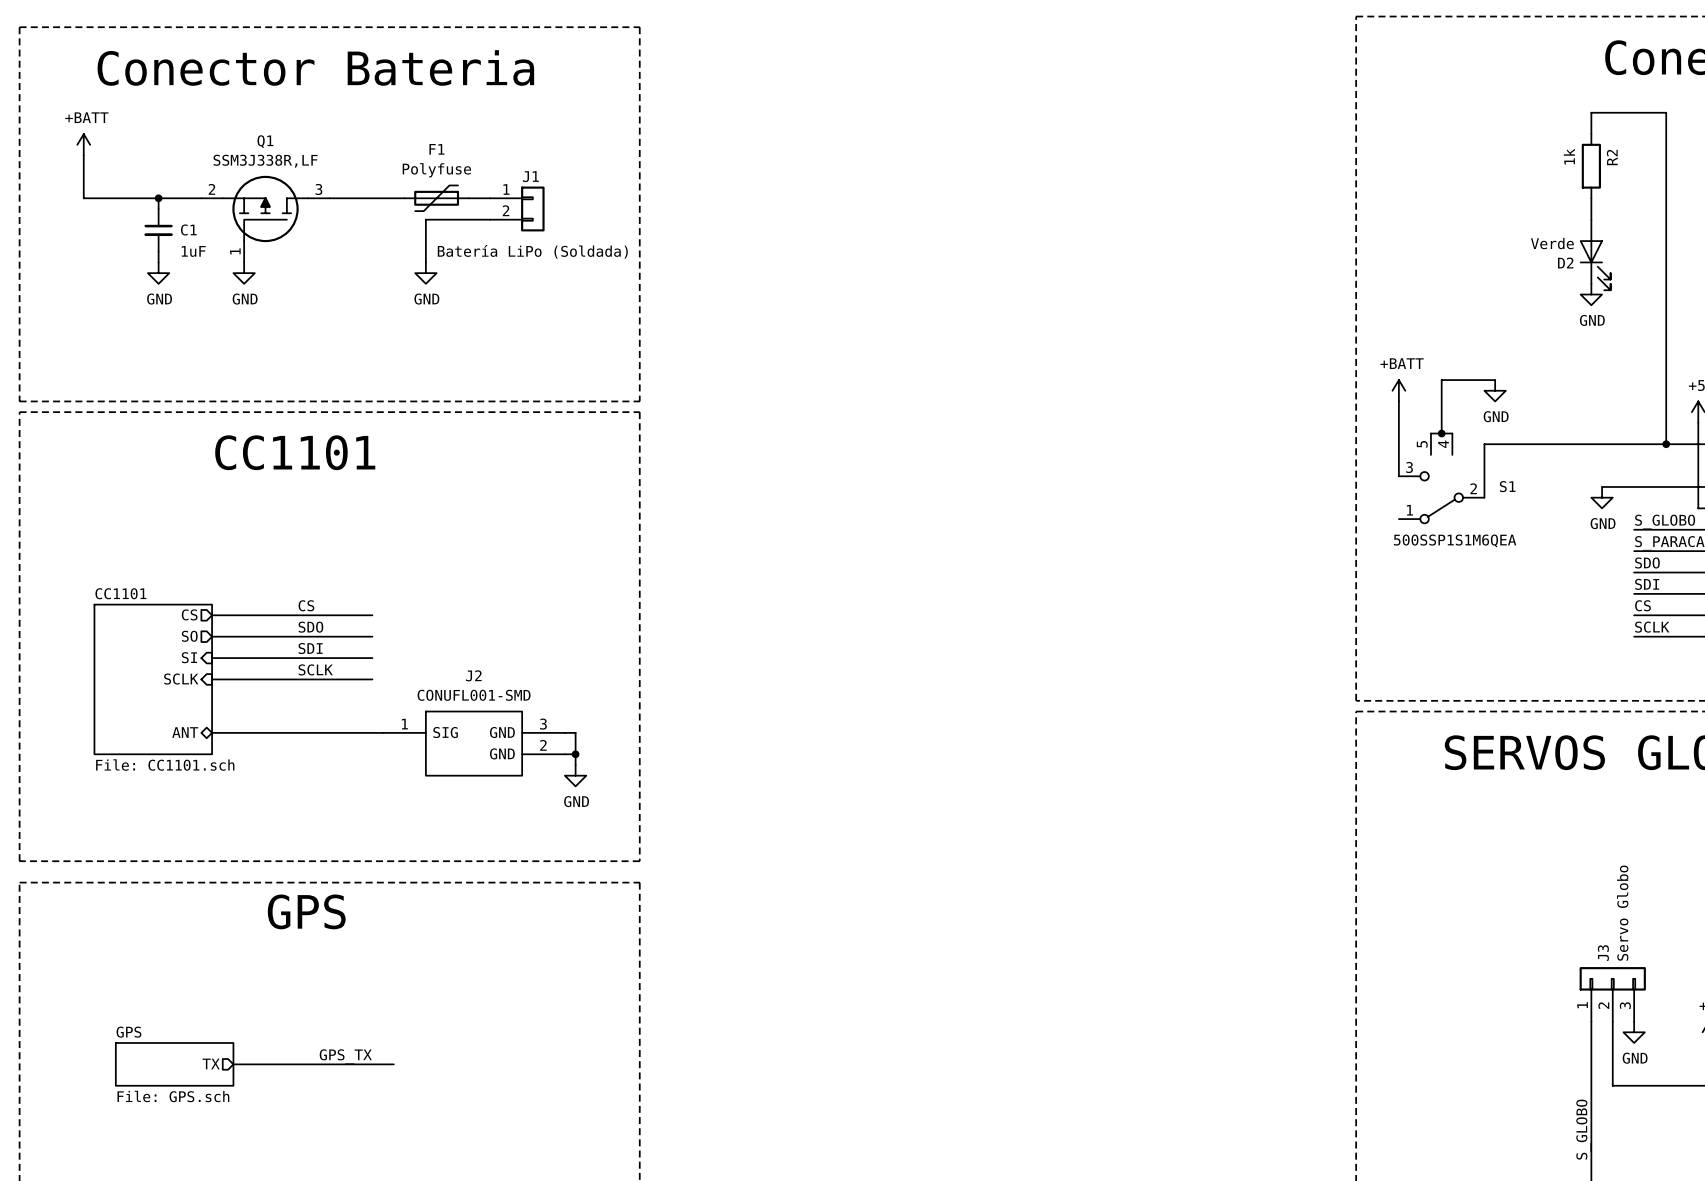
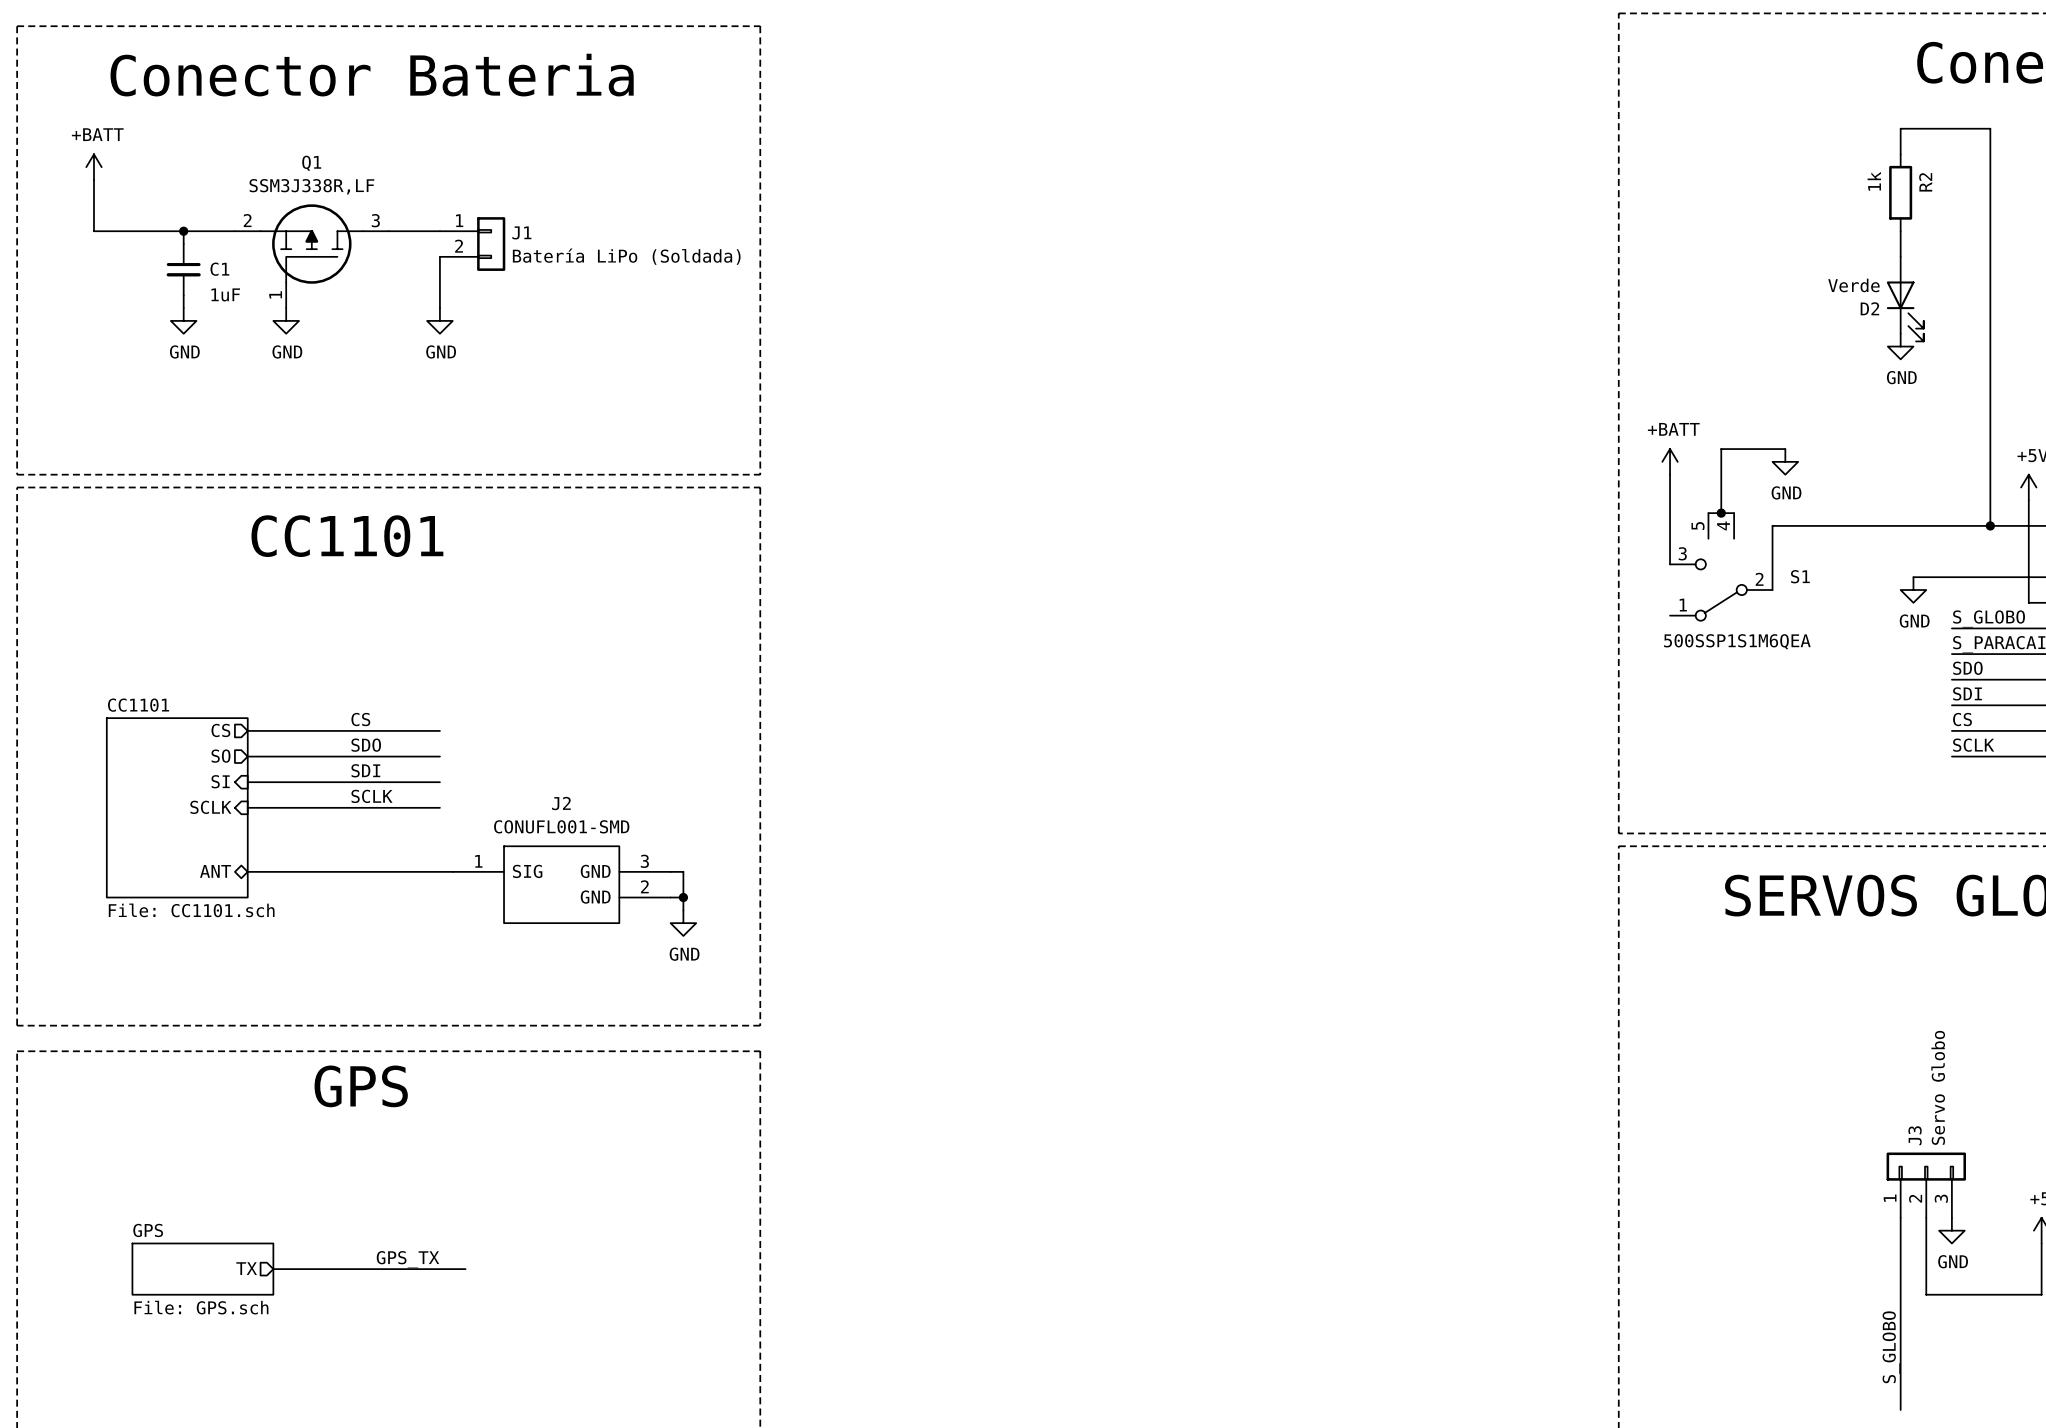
J1 name position: J1 (530, 176) -> J1 (521, 232)
F1: Polyfuse (436, 198) -> none
wire: (468, 198) (490, 198) -> none
J1 position: (517, 208) -> (472, 244)
wire: none -> (439, 256) (439, 308)
wire: (490, 219) (425, 219) (425, 262) -> none
J1 value position: Batería LiPo (Soldada) (532, 251) -> Batería LiPo (Soldada) (626, 256)
power symbol position: GND (425, 273) -> GND (439, 320)

